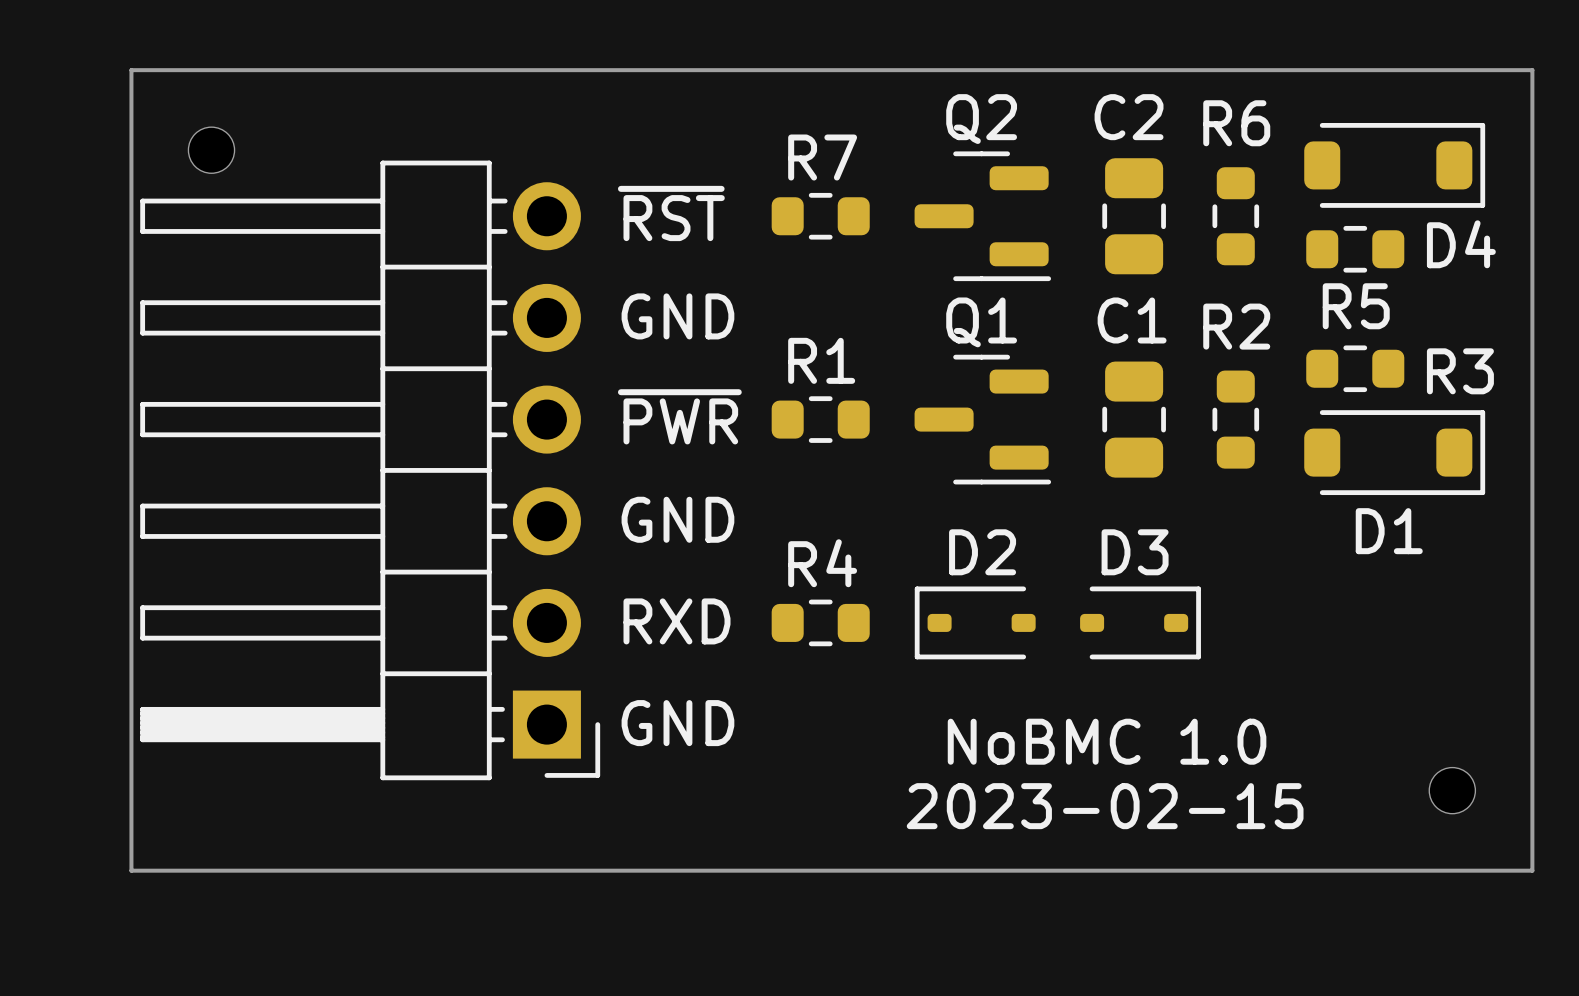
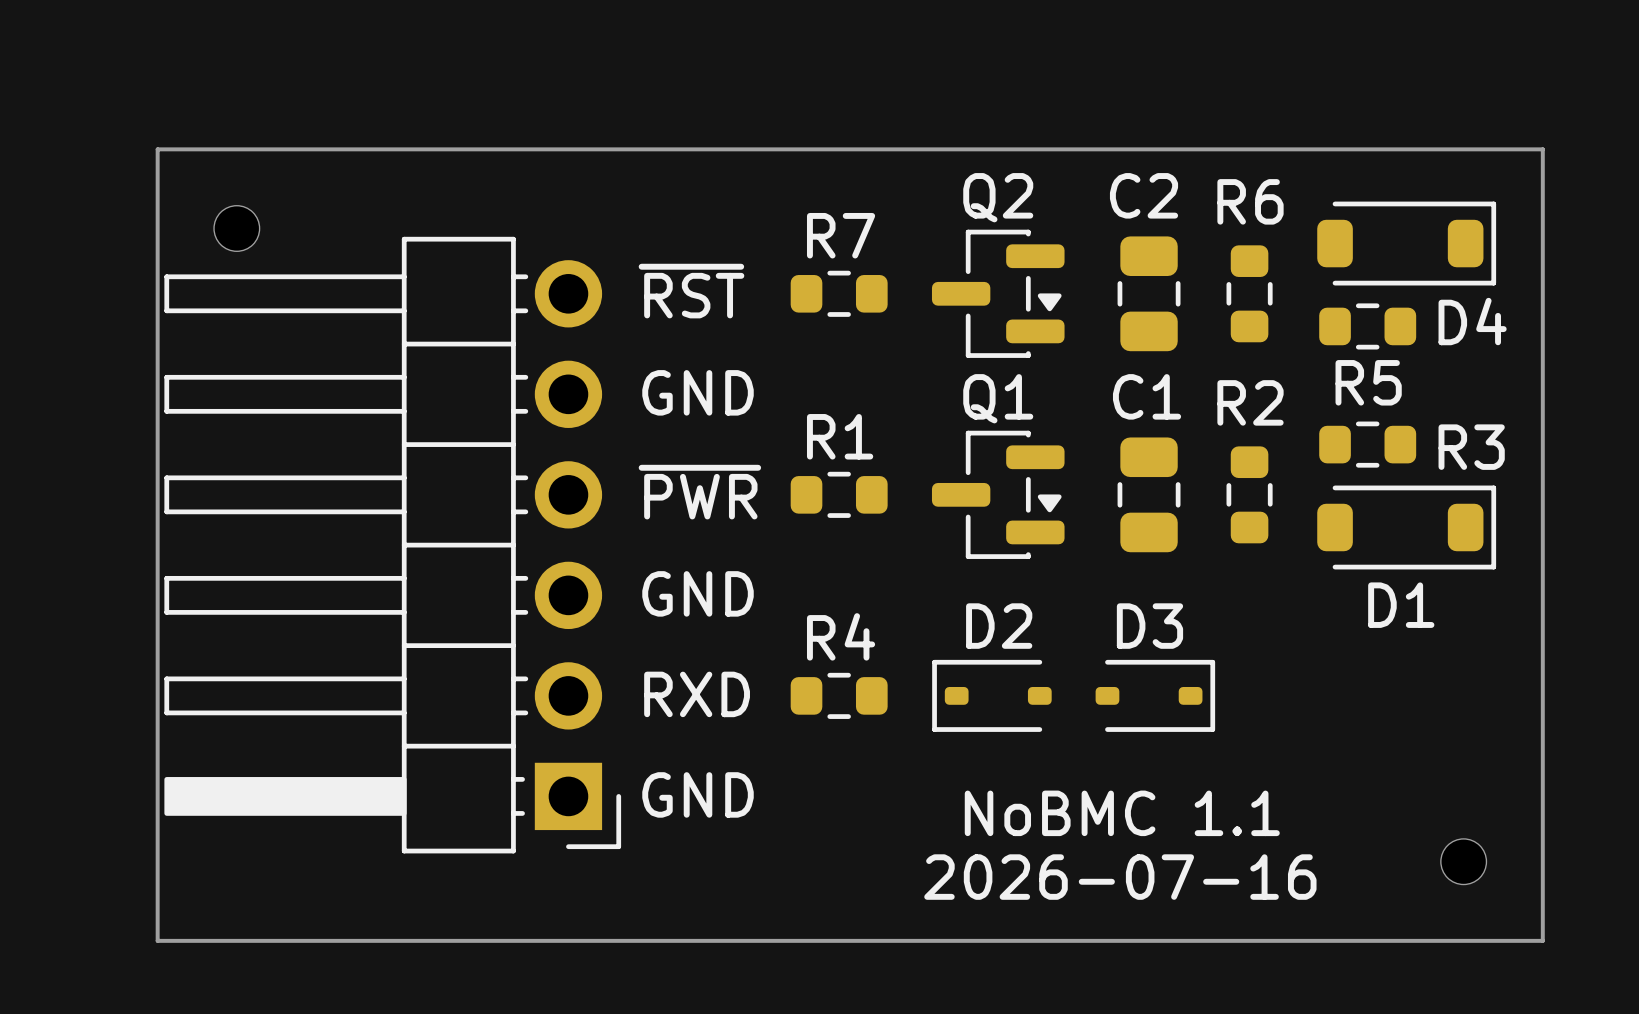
Q2 footprint: [914, 151, 1052, 282] -> [931, 229, 1065, 358]
part footprint: [140, 160, 601, 781] -> [164, 236, 622, 854]
Q1 footprint: [914, 354, 1052, 485] -> [931, 430, 1065, 559]
text: NoBMC 1.0 (1107, 741) -> NoBMC 1.1 (1122, 813)
text: 2023-02-15 (1105, 806) -> 2026-07-16 (1120, 877)

